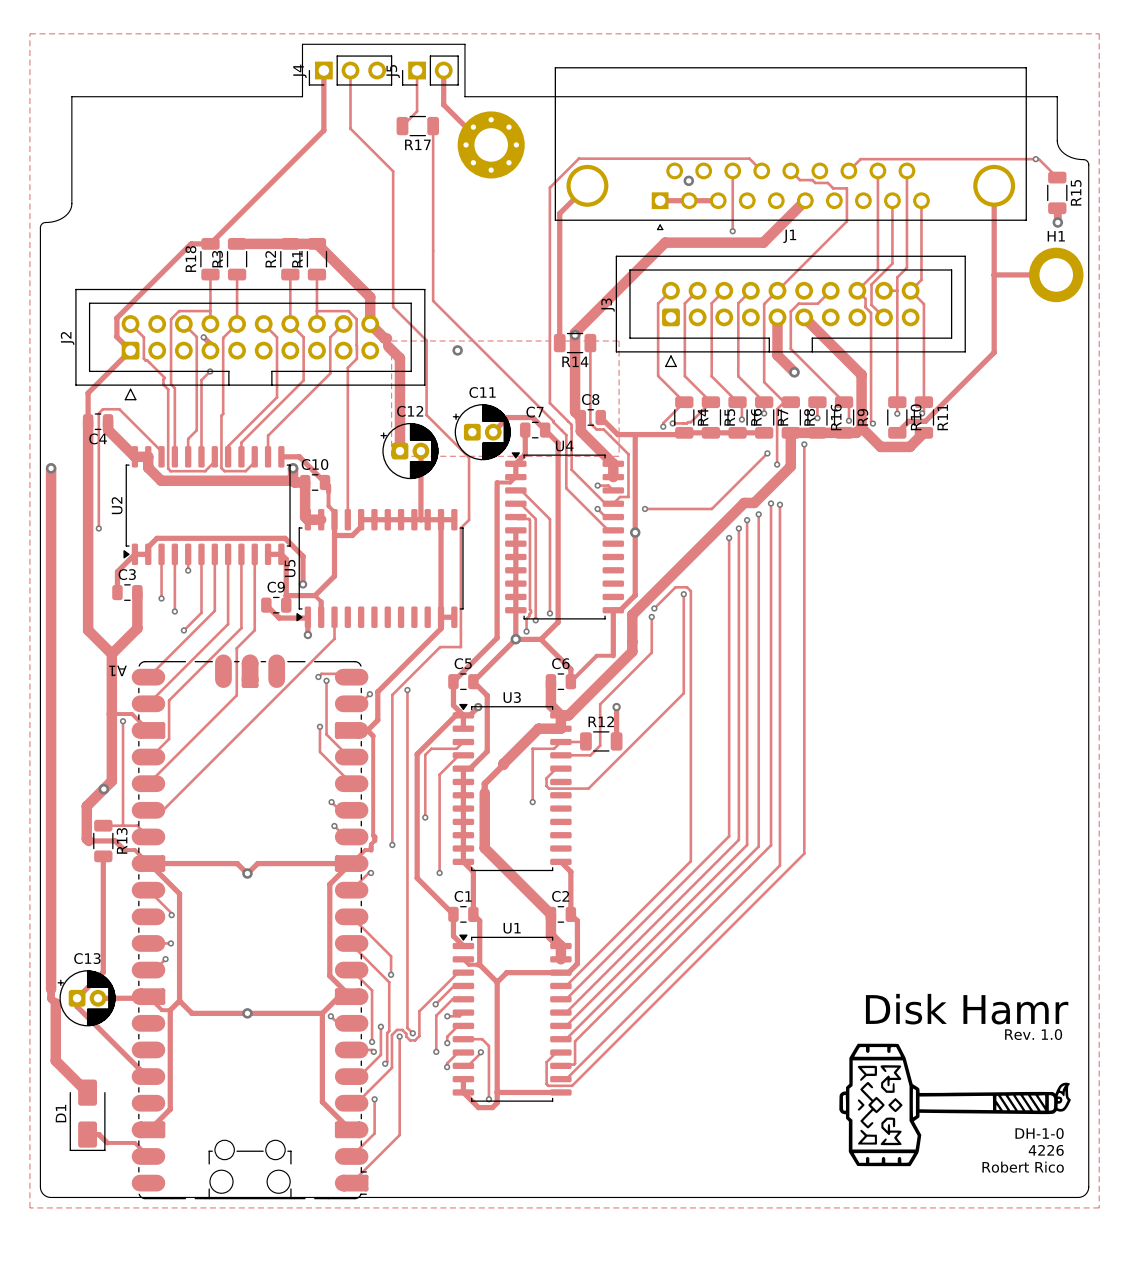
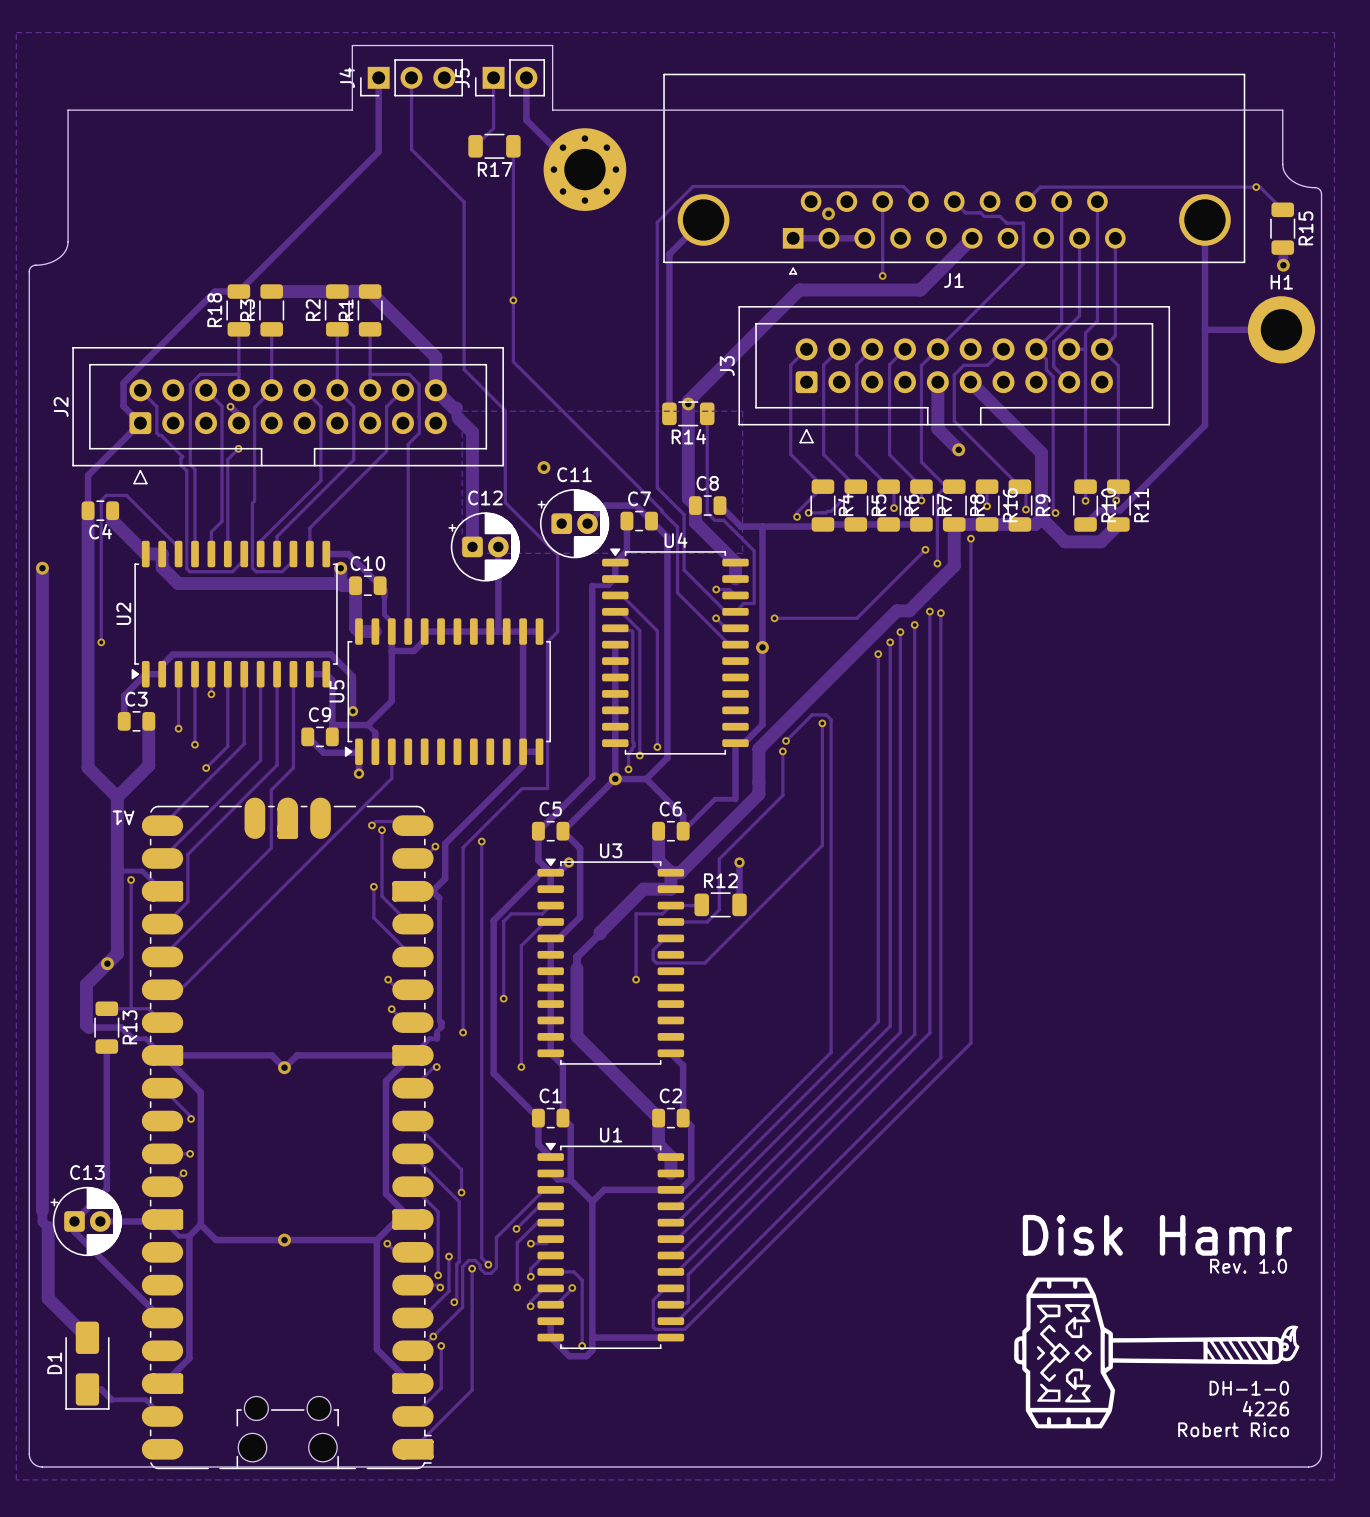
via: none -> (513, 300)
via position: (457, 350) -> (543, 467)
via: none -> (433, 1336)

